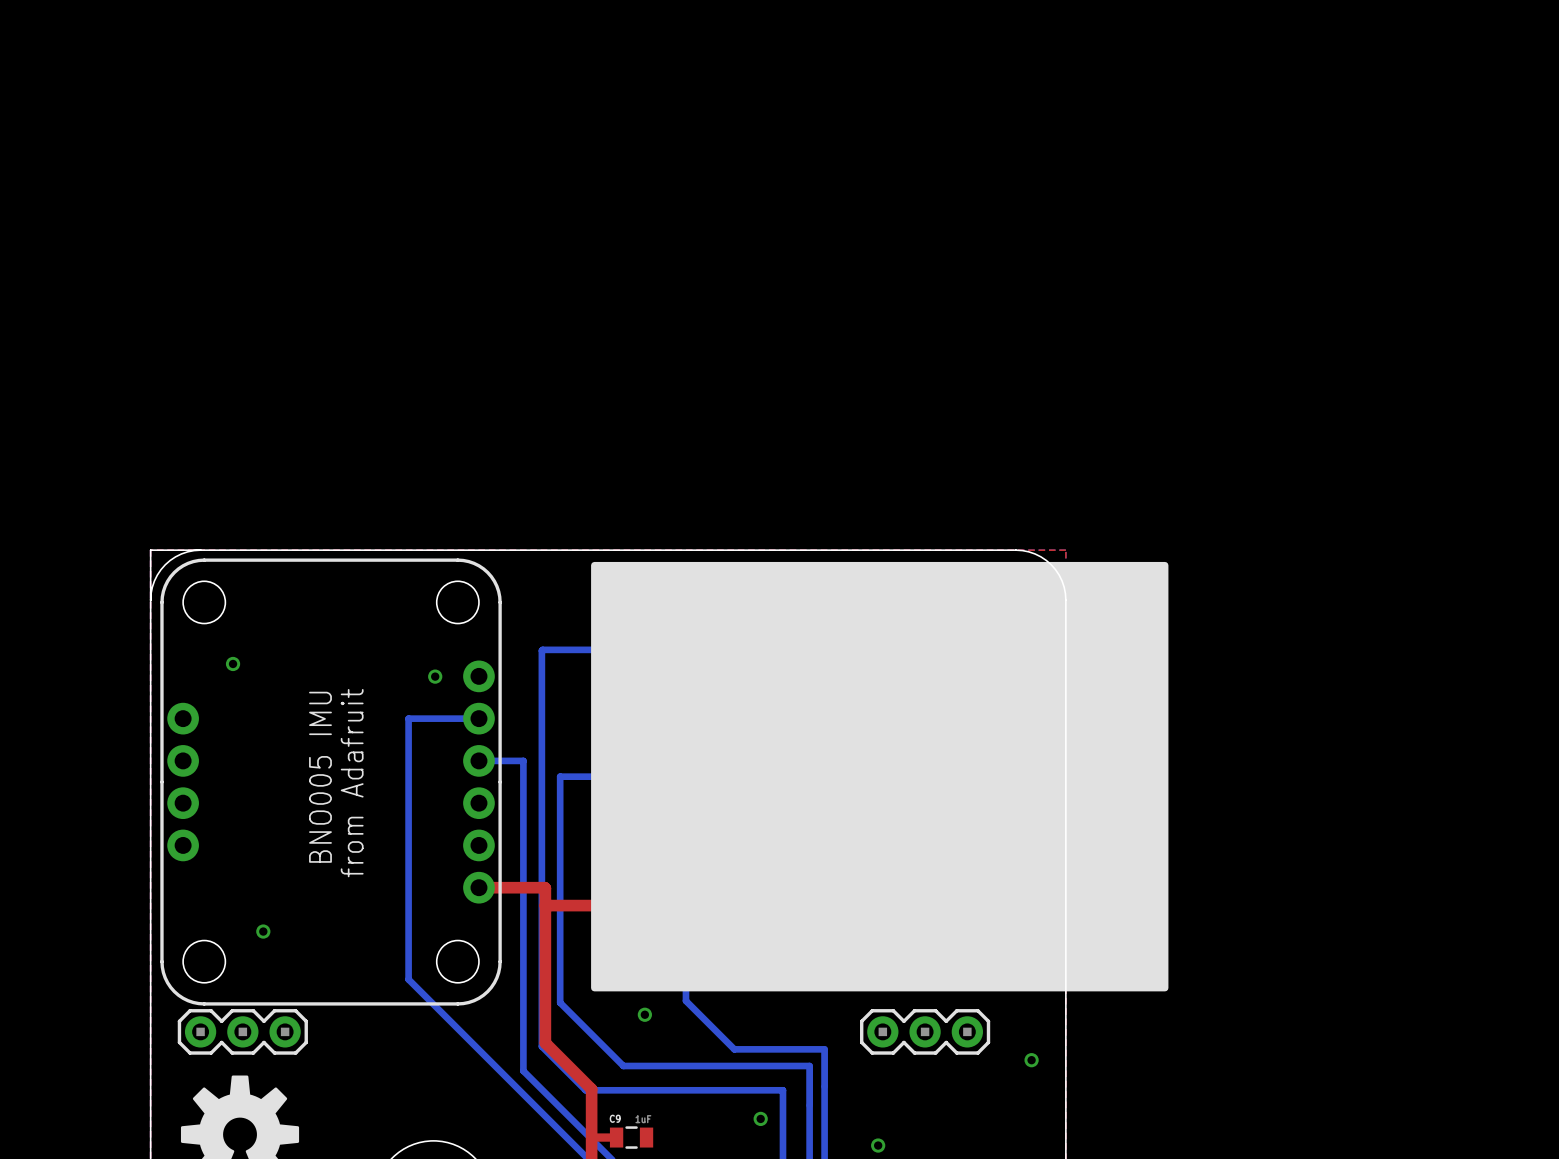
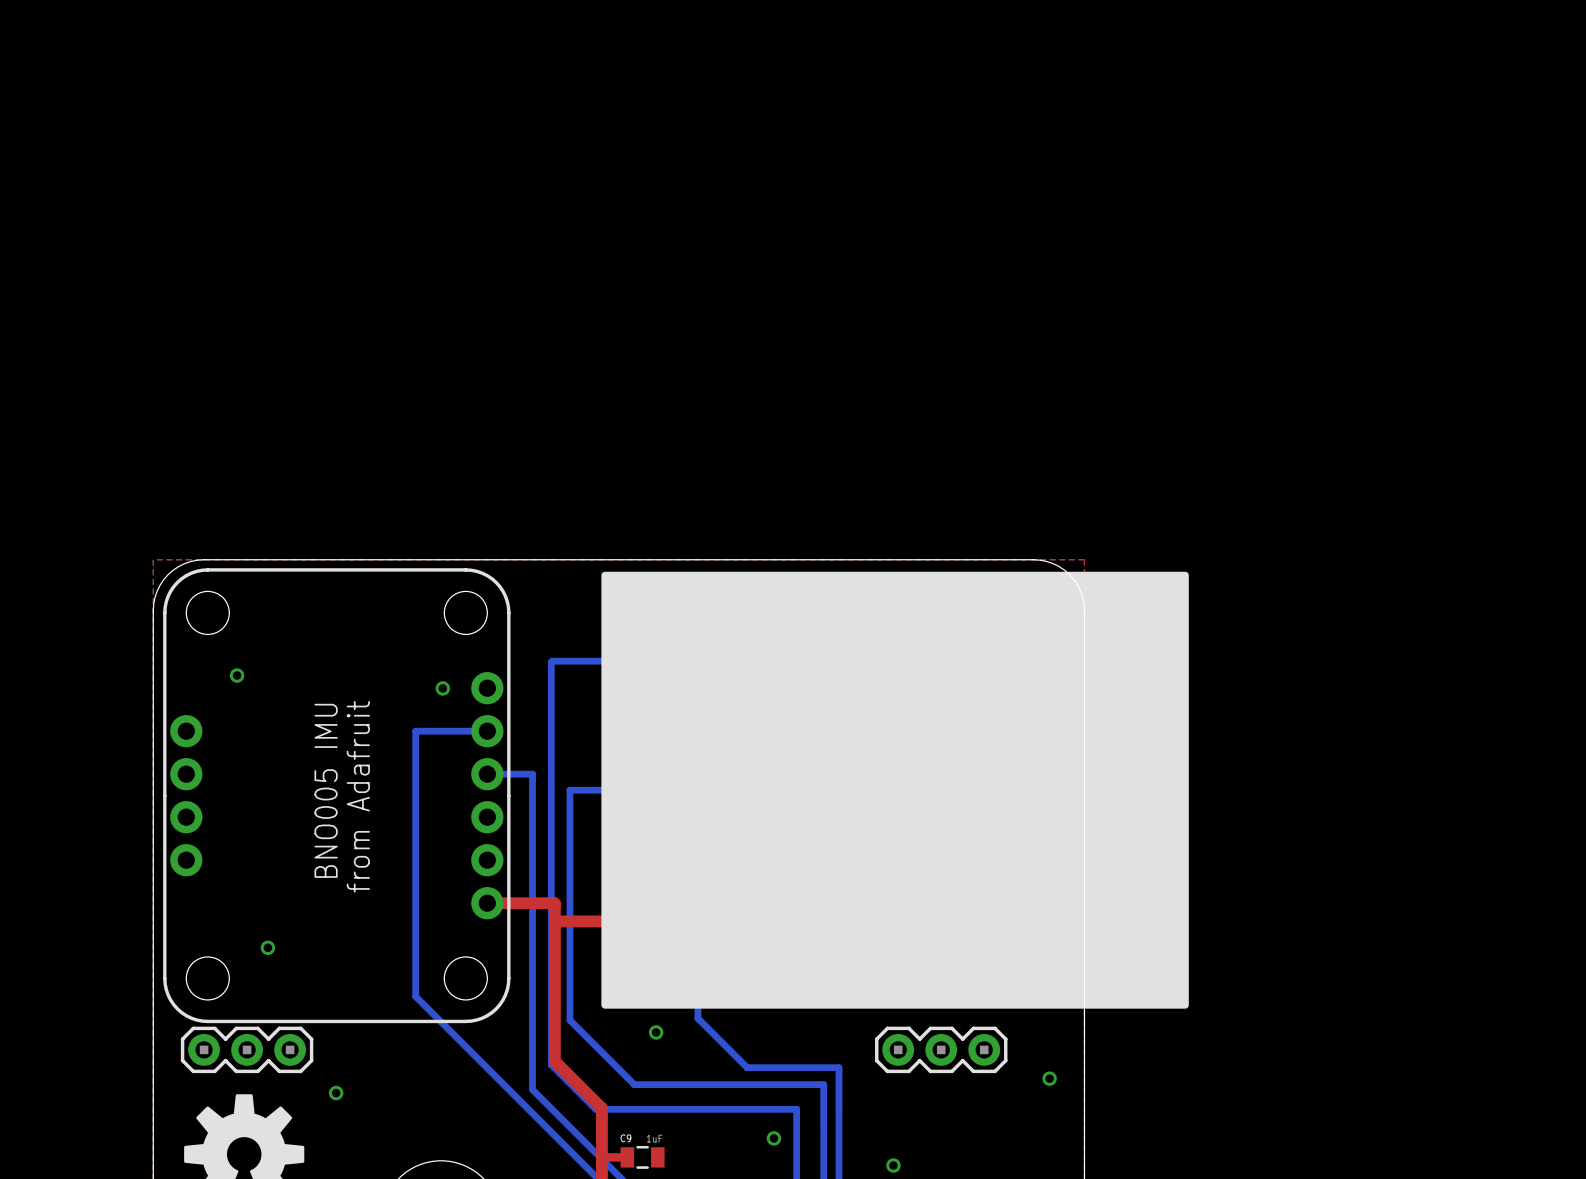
board edge: (200, 550) (150, 550) (150, 600) -> none
via: none -> (336, 1093)

